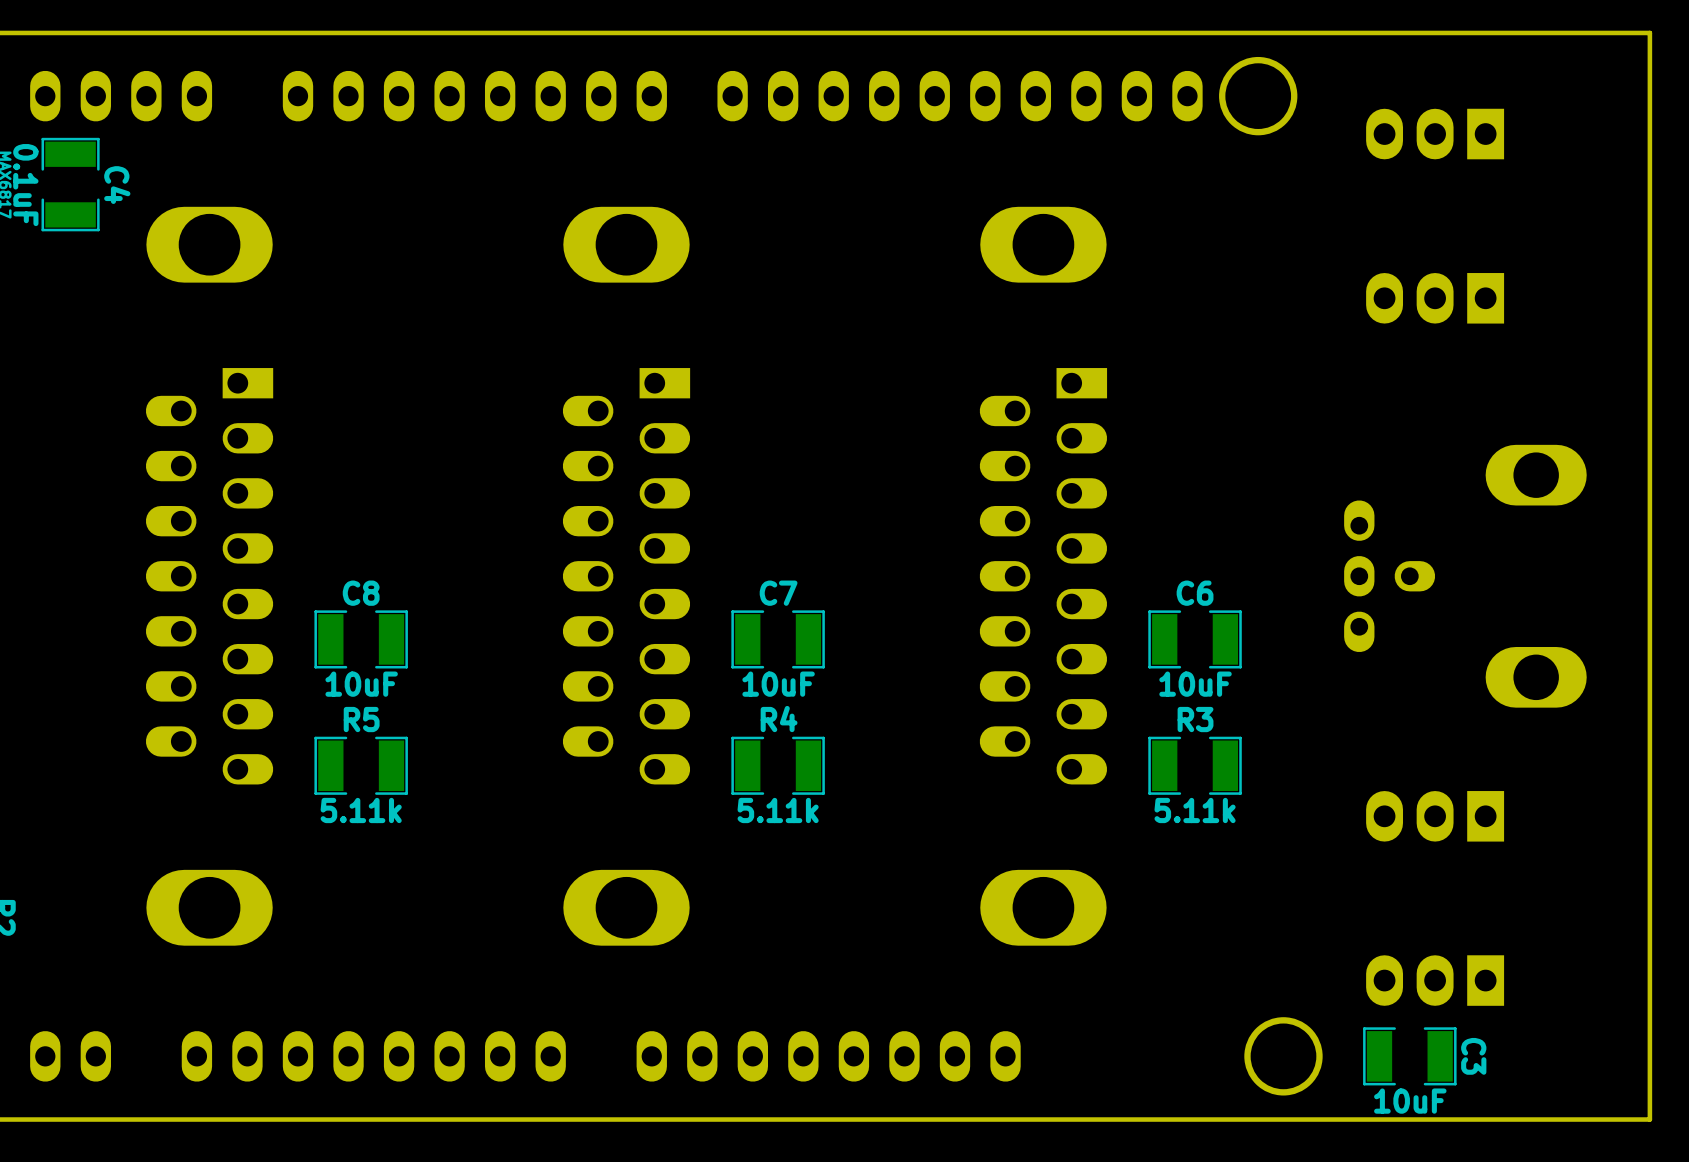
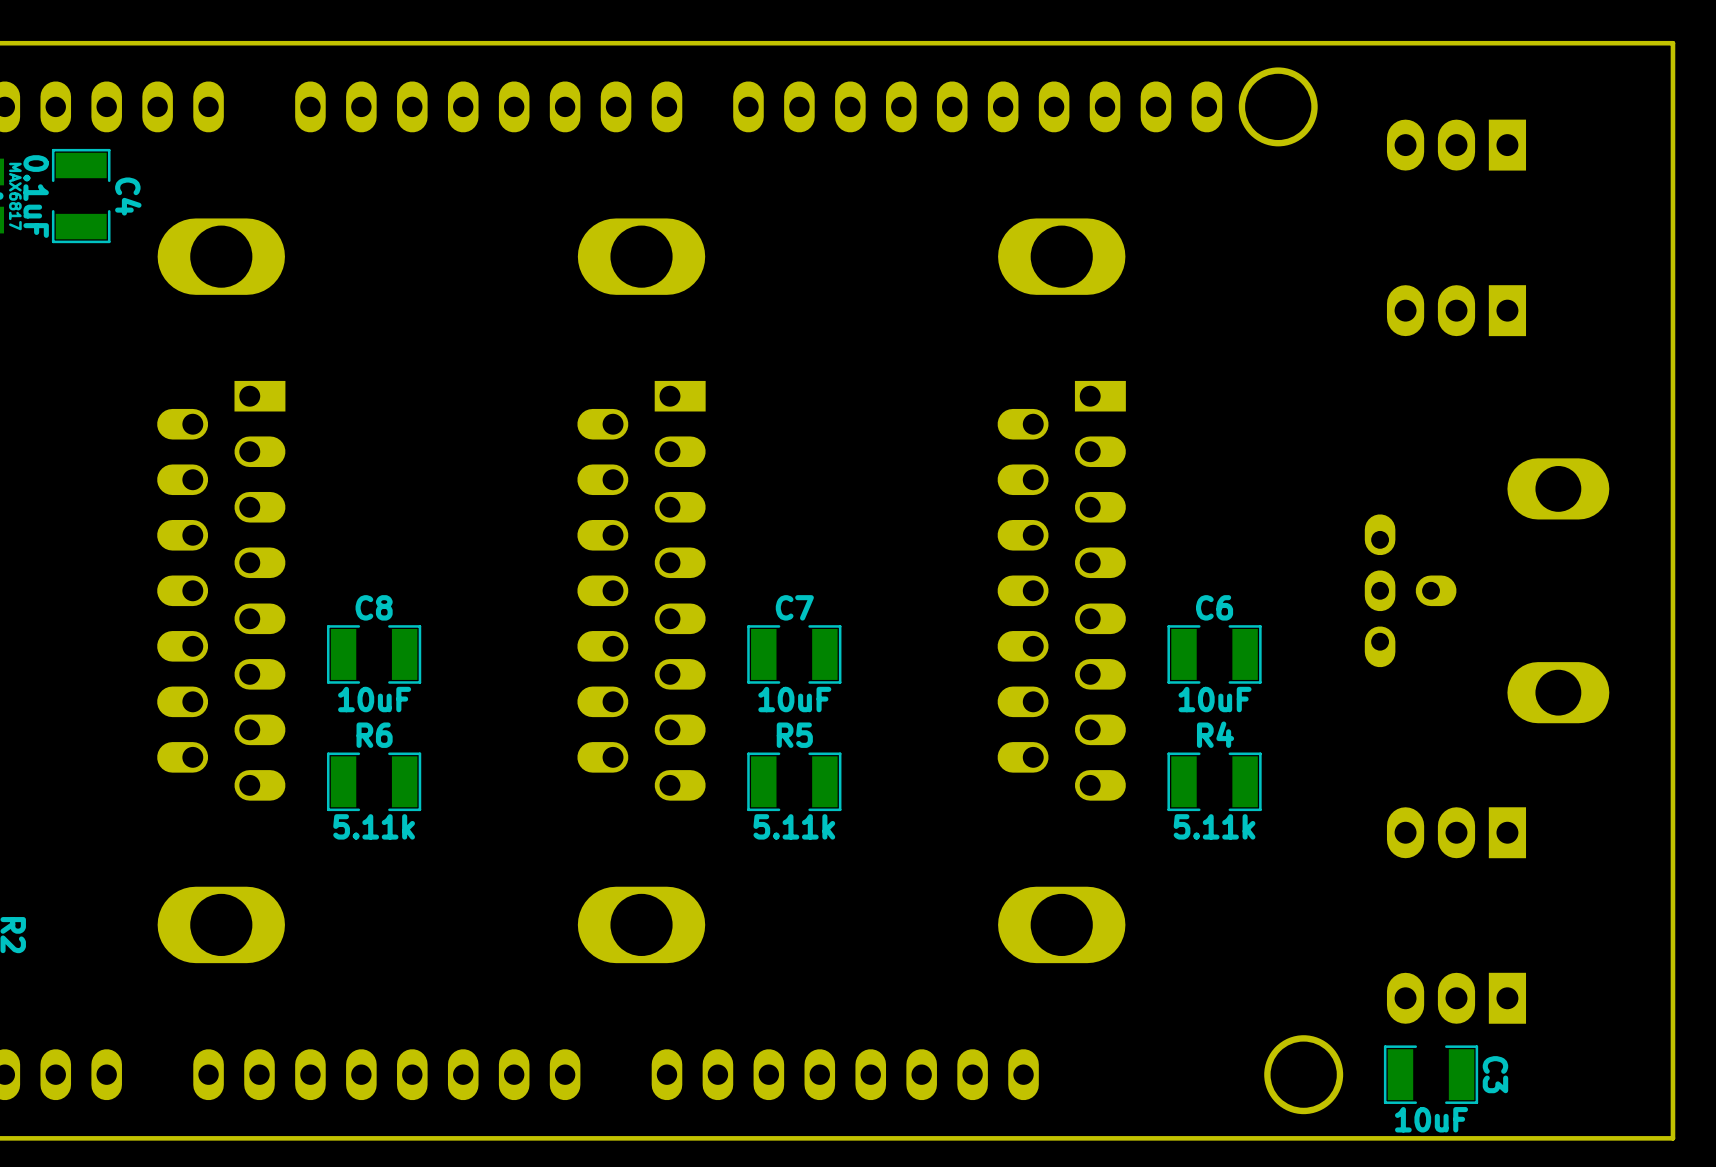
R5 name: R5 (361, 719) -> R6 (374, 735)
R4 name: R4 (779, 719) -> R5 (794, 735)
R3 name: R3 (1195, 719) -> R4 (1215, 734)

